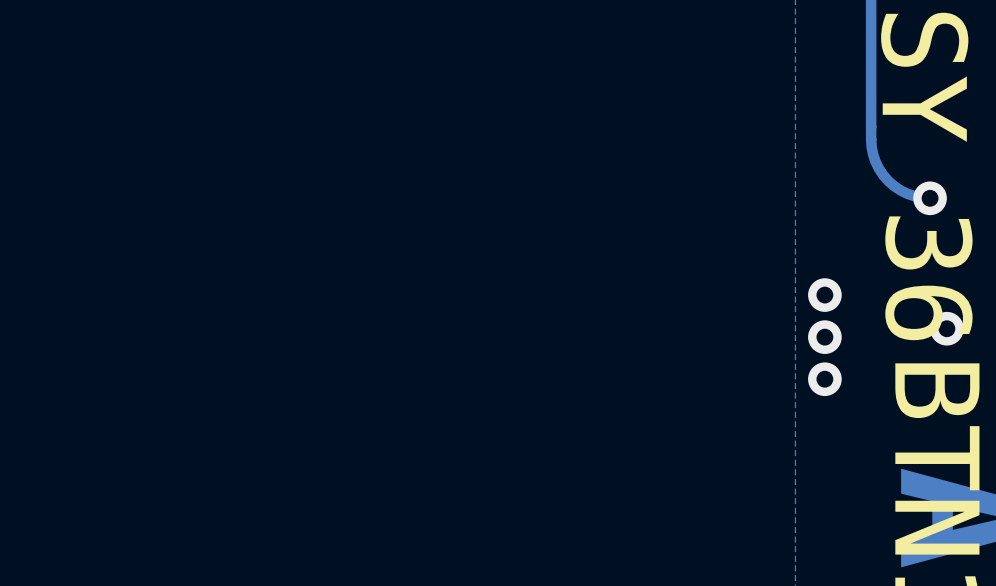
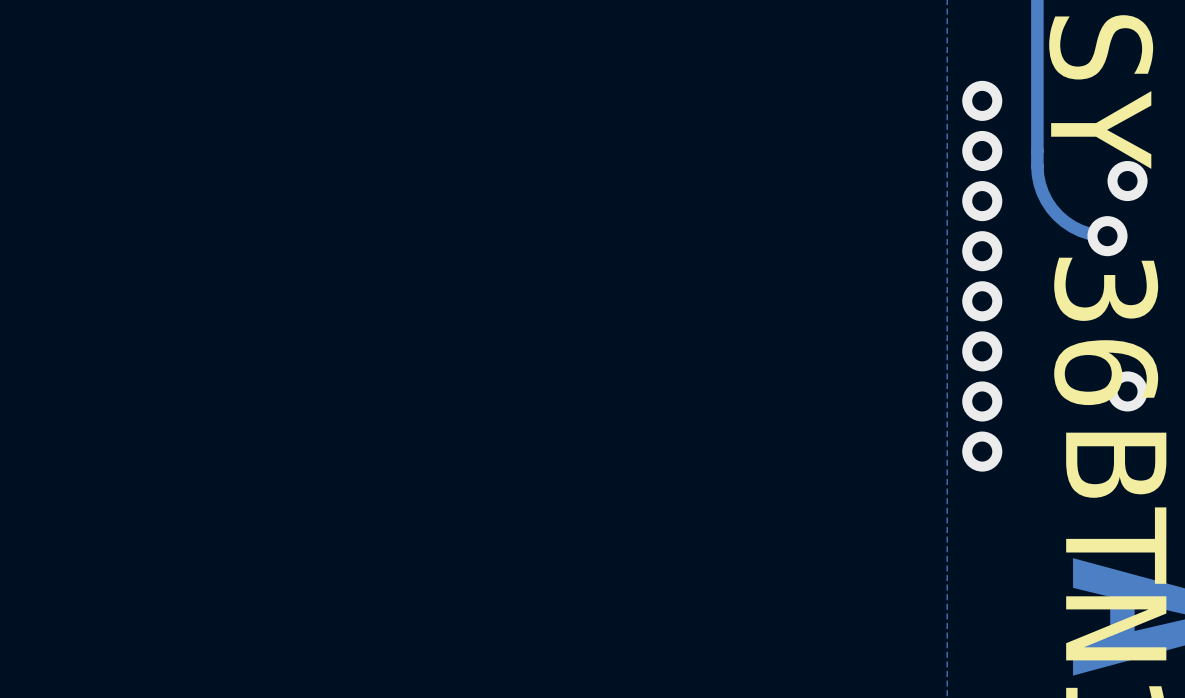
via: none -> (982, 100)
via: none -> (982, 150)
via: none -> (1127, 181)
via: none -> (982, 201)
via: none -> (982, 251)
via: none -> (982, 301)

